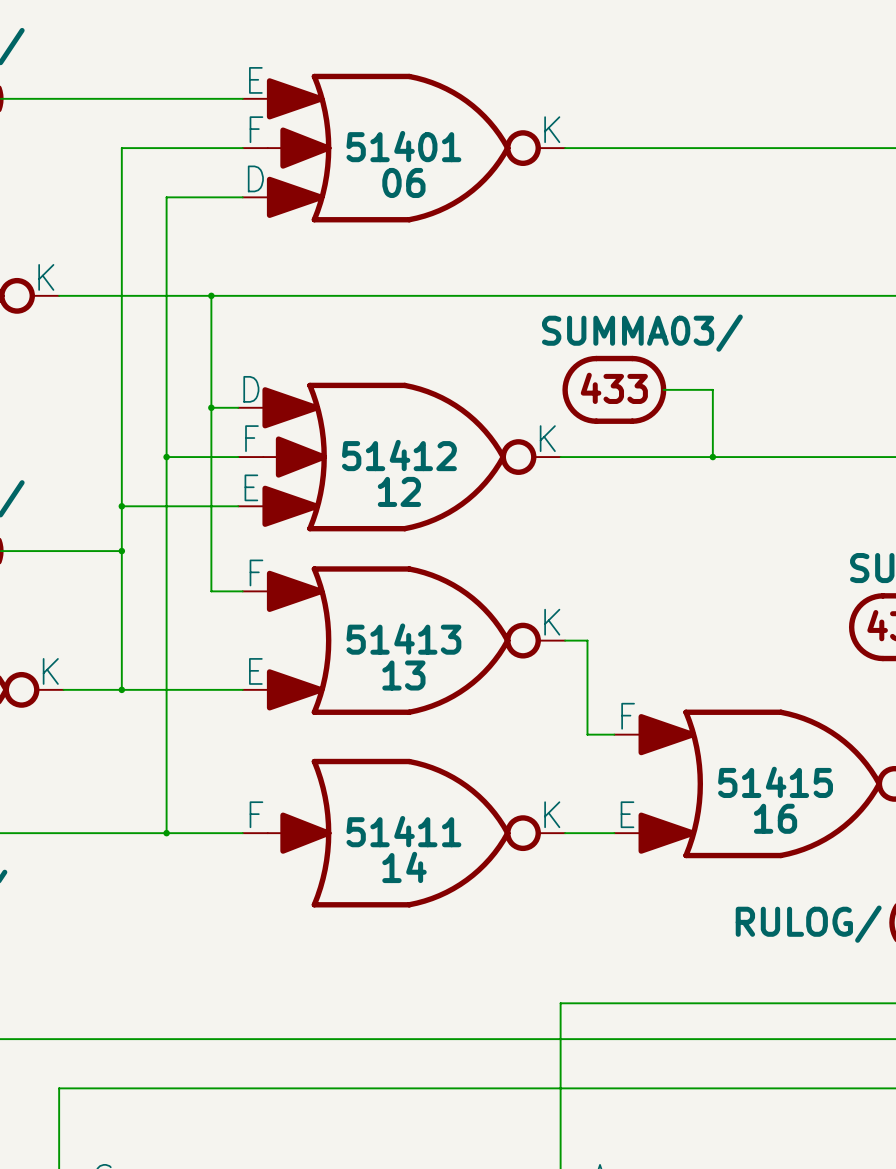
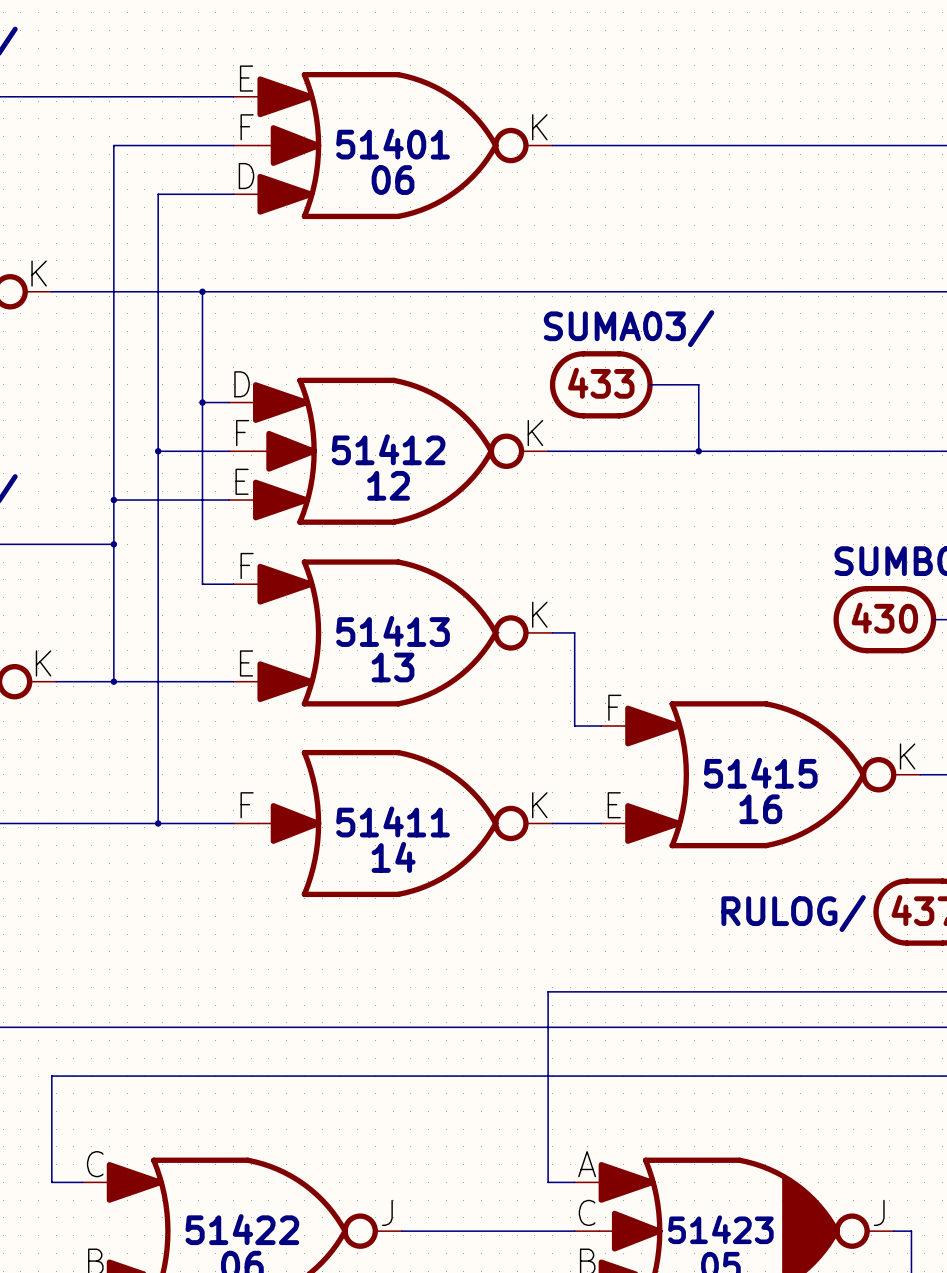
part text: SUMMA03/ (642, 333) -> SUMA03/ (629, 328)

